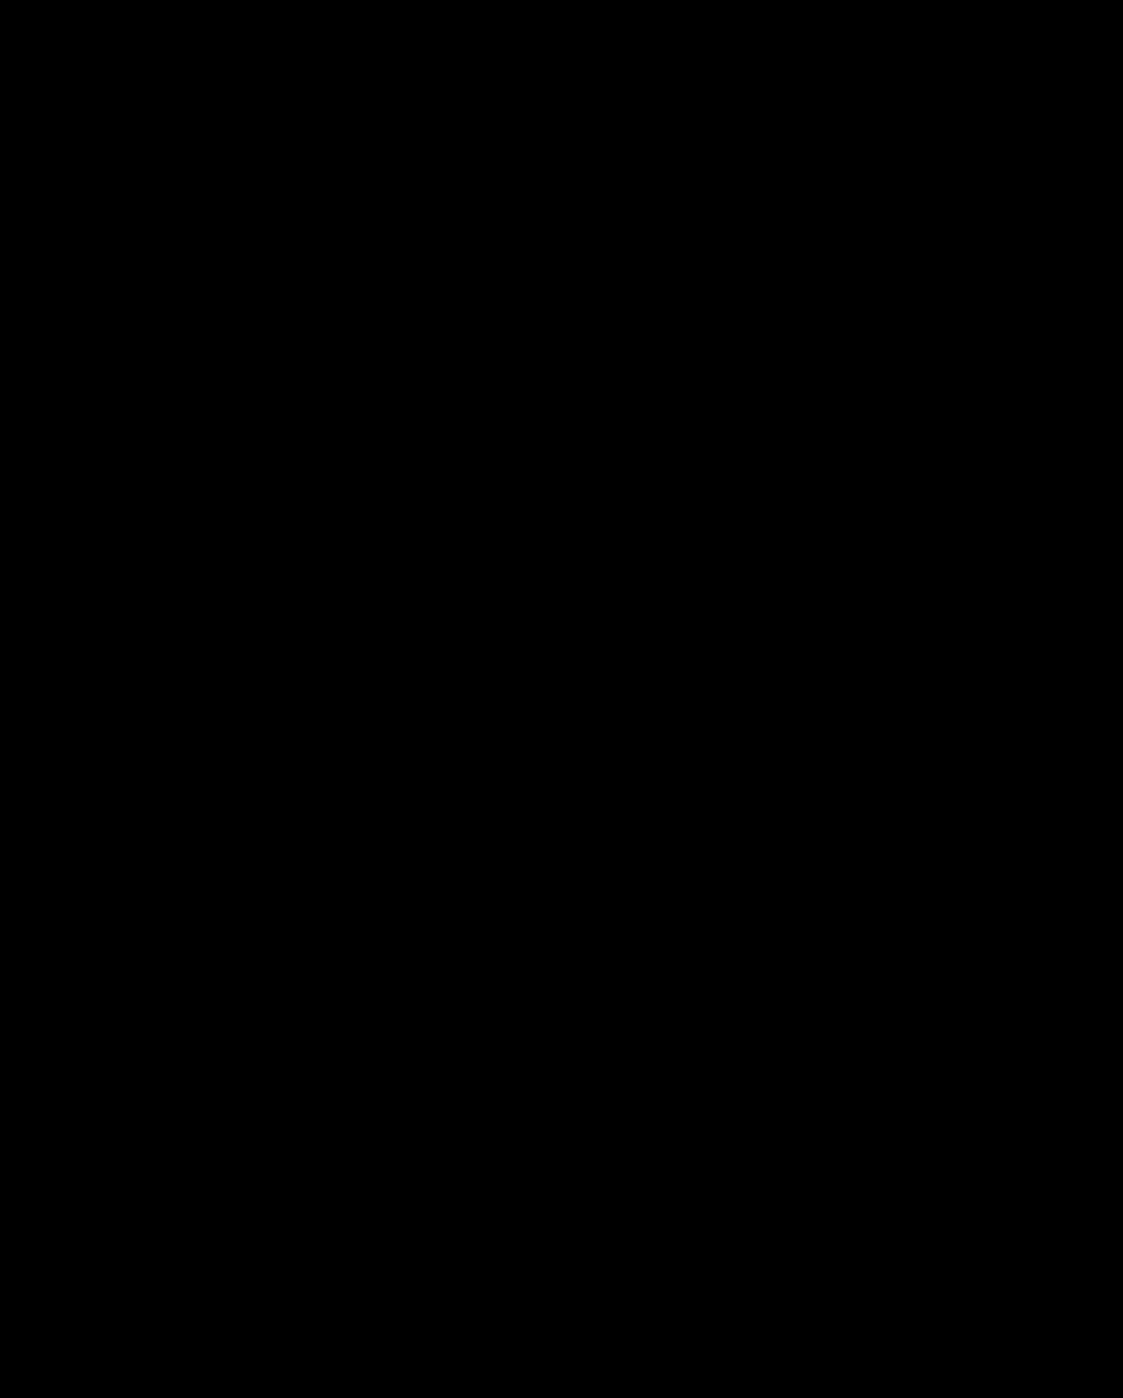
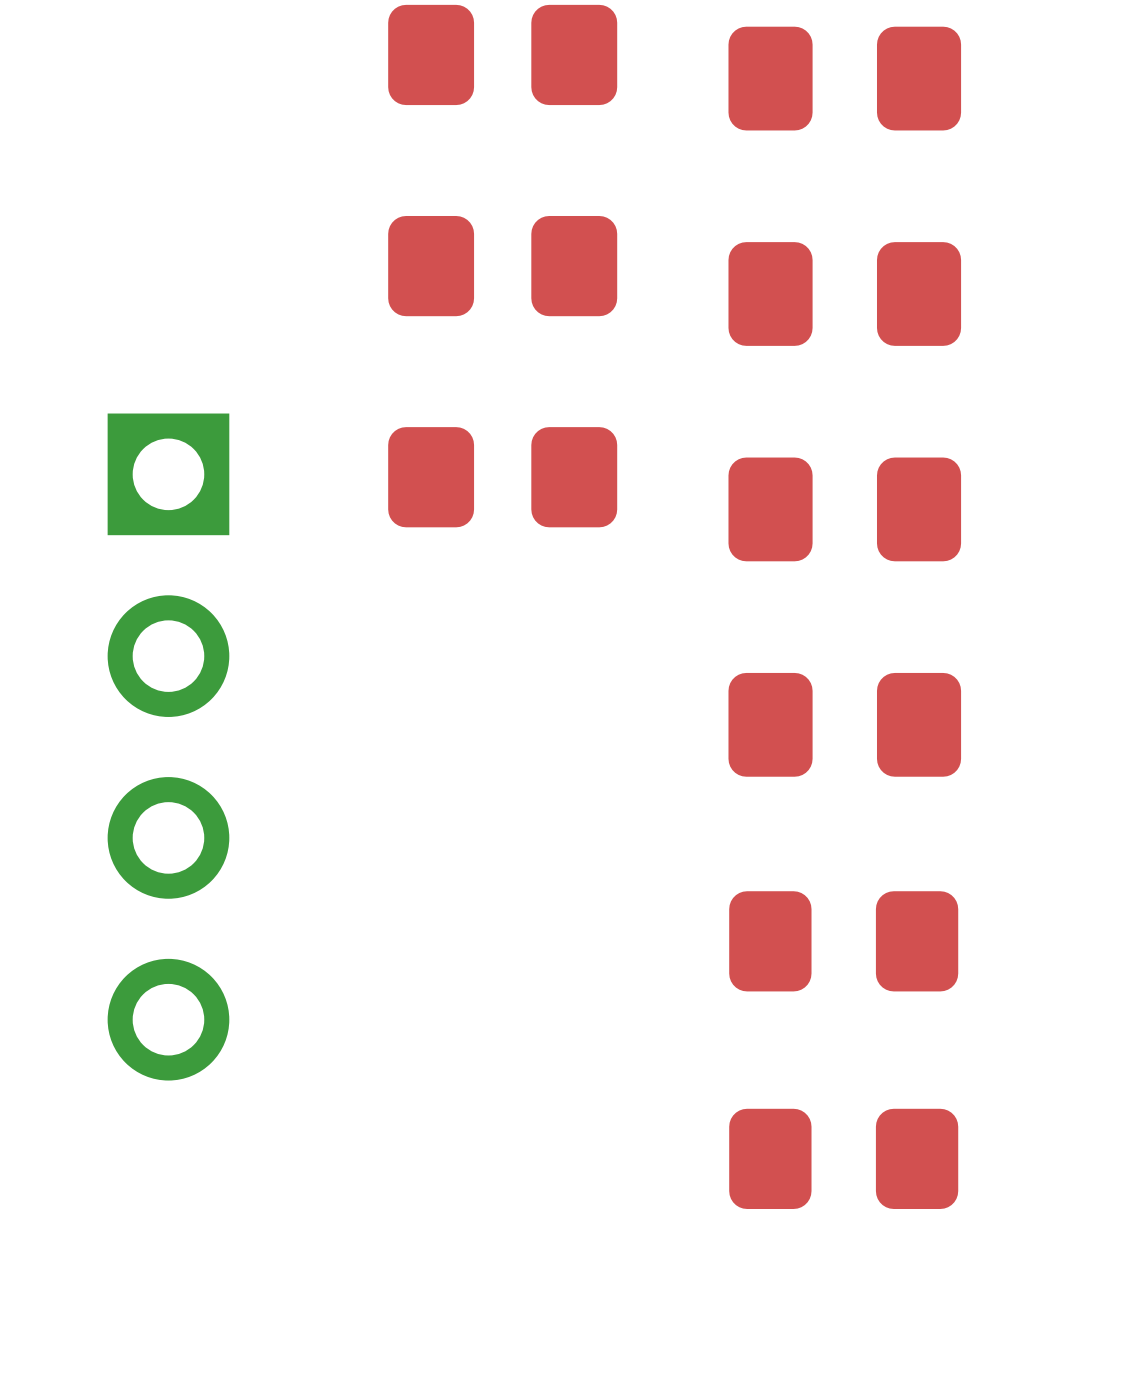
part: none -> (502, 54)
part: none -> (844, 78)
part: none -> (502, 266)
part: none -> (844, 294)
part: none -> (502, 477)
part: none -> (844, 509)
part: none -> (844, 724)
part: none -> (168, 747)
part: none -> (843, 941)
part: none -> (843, 1158)

